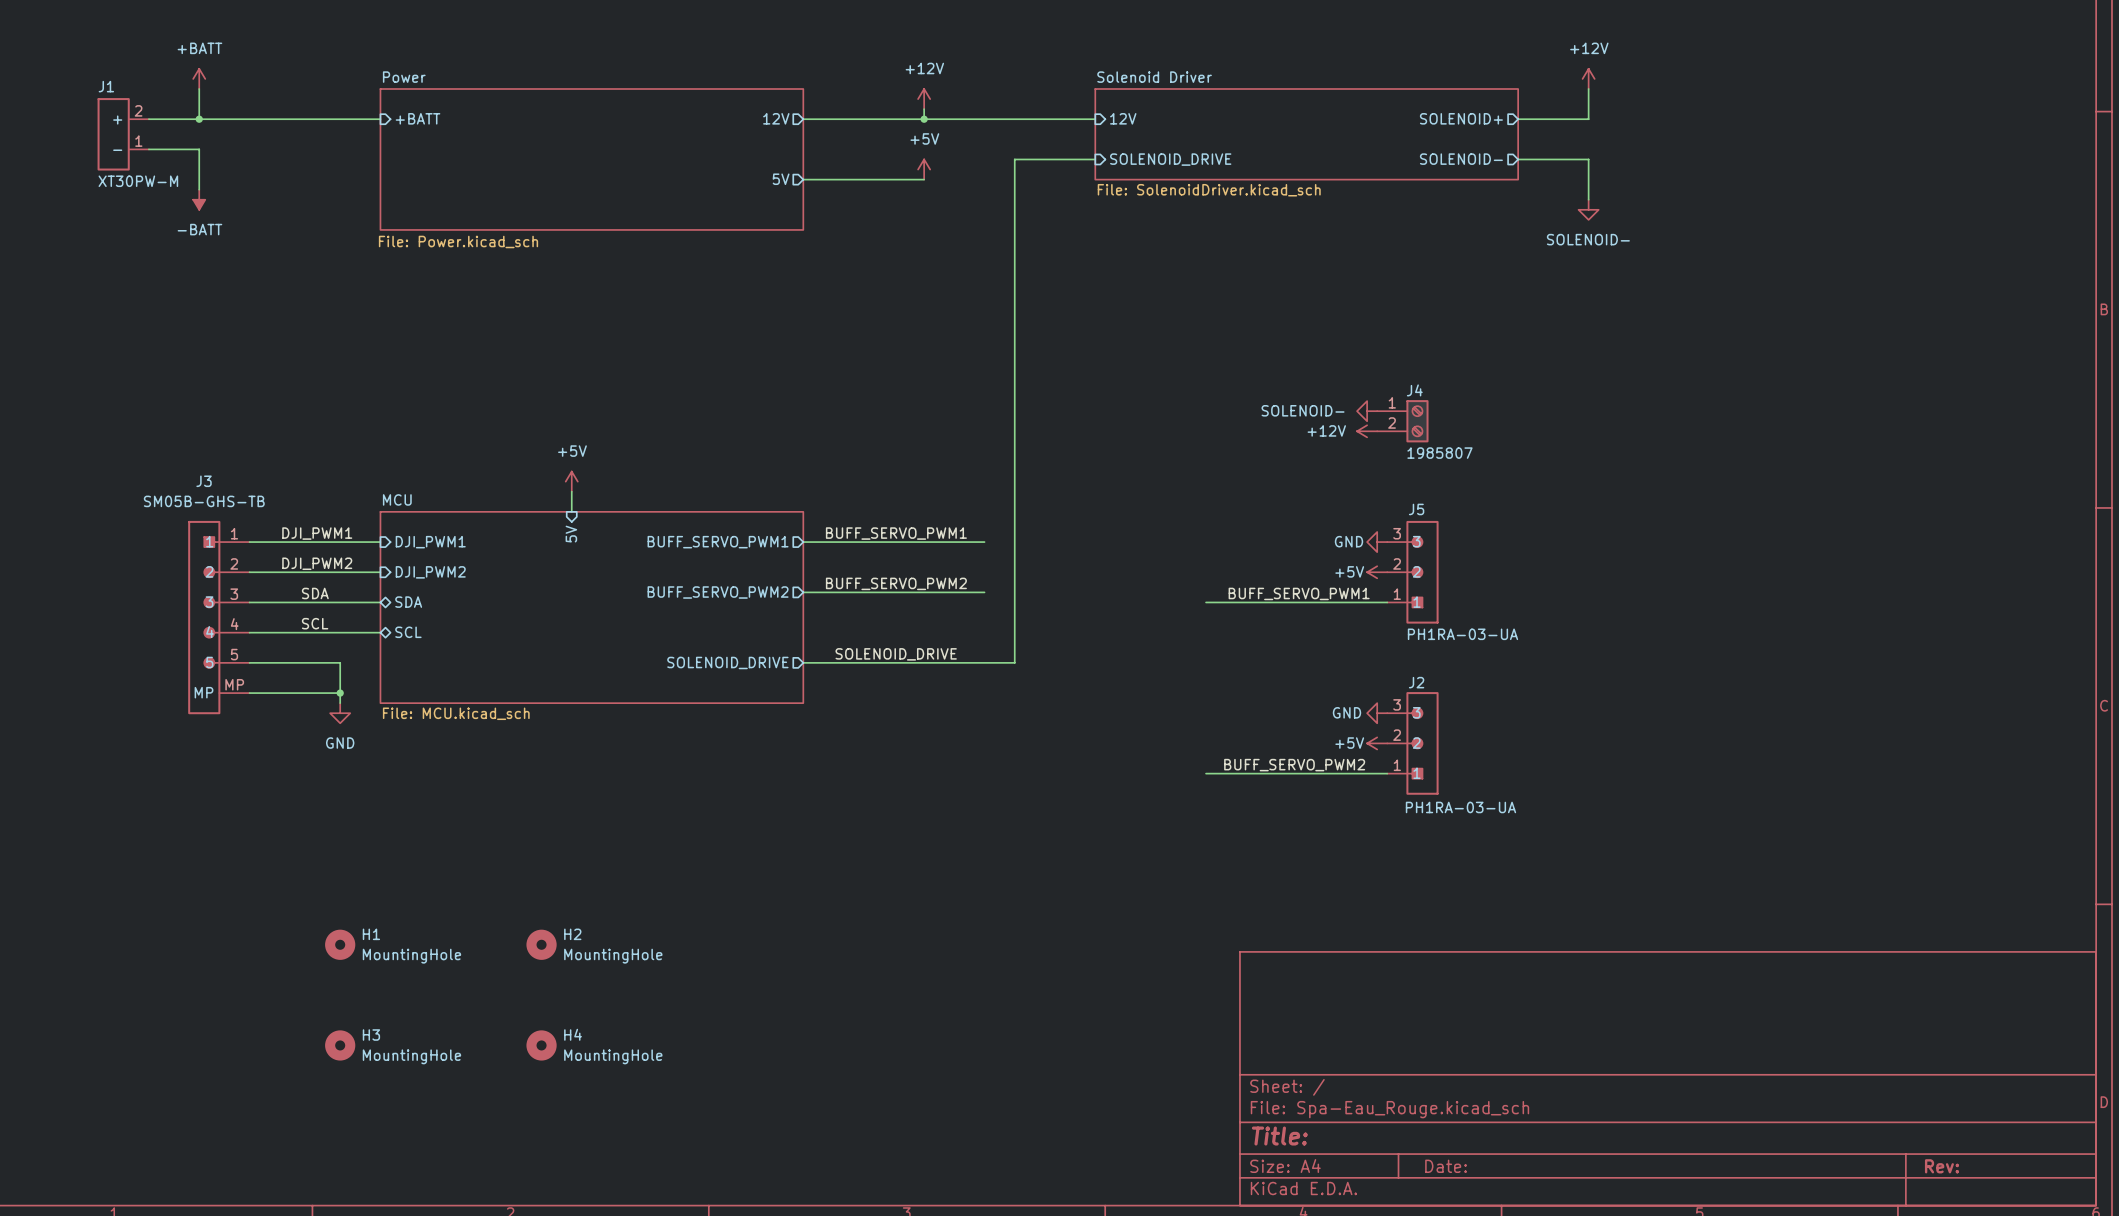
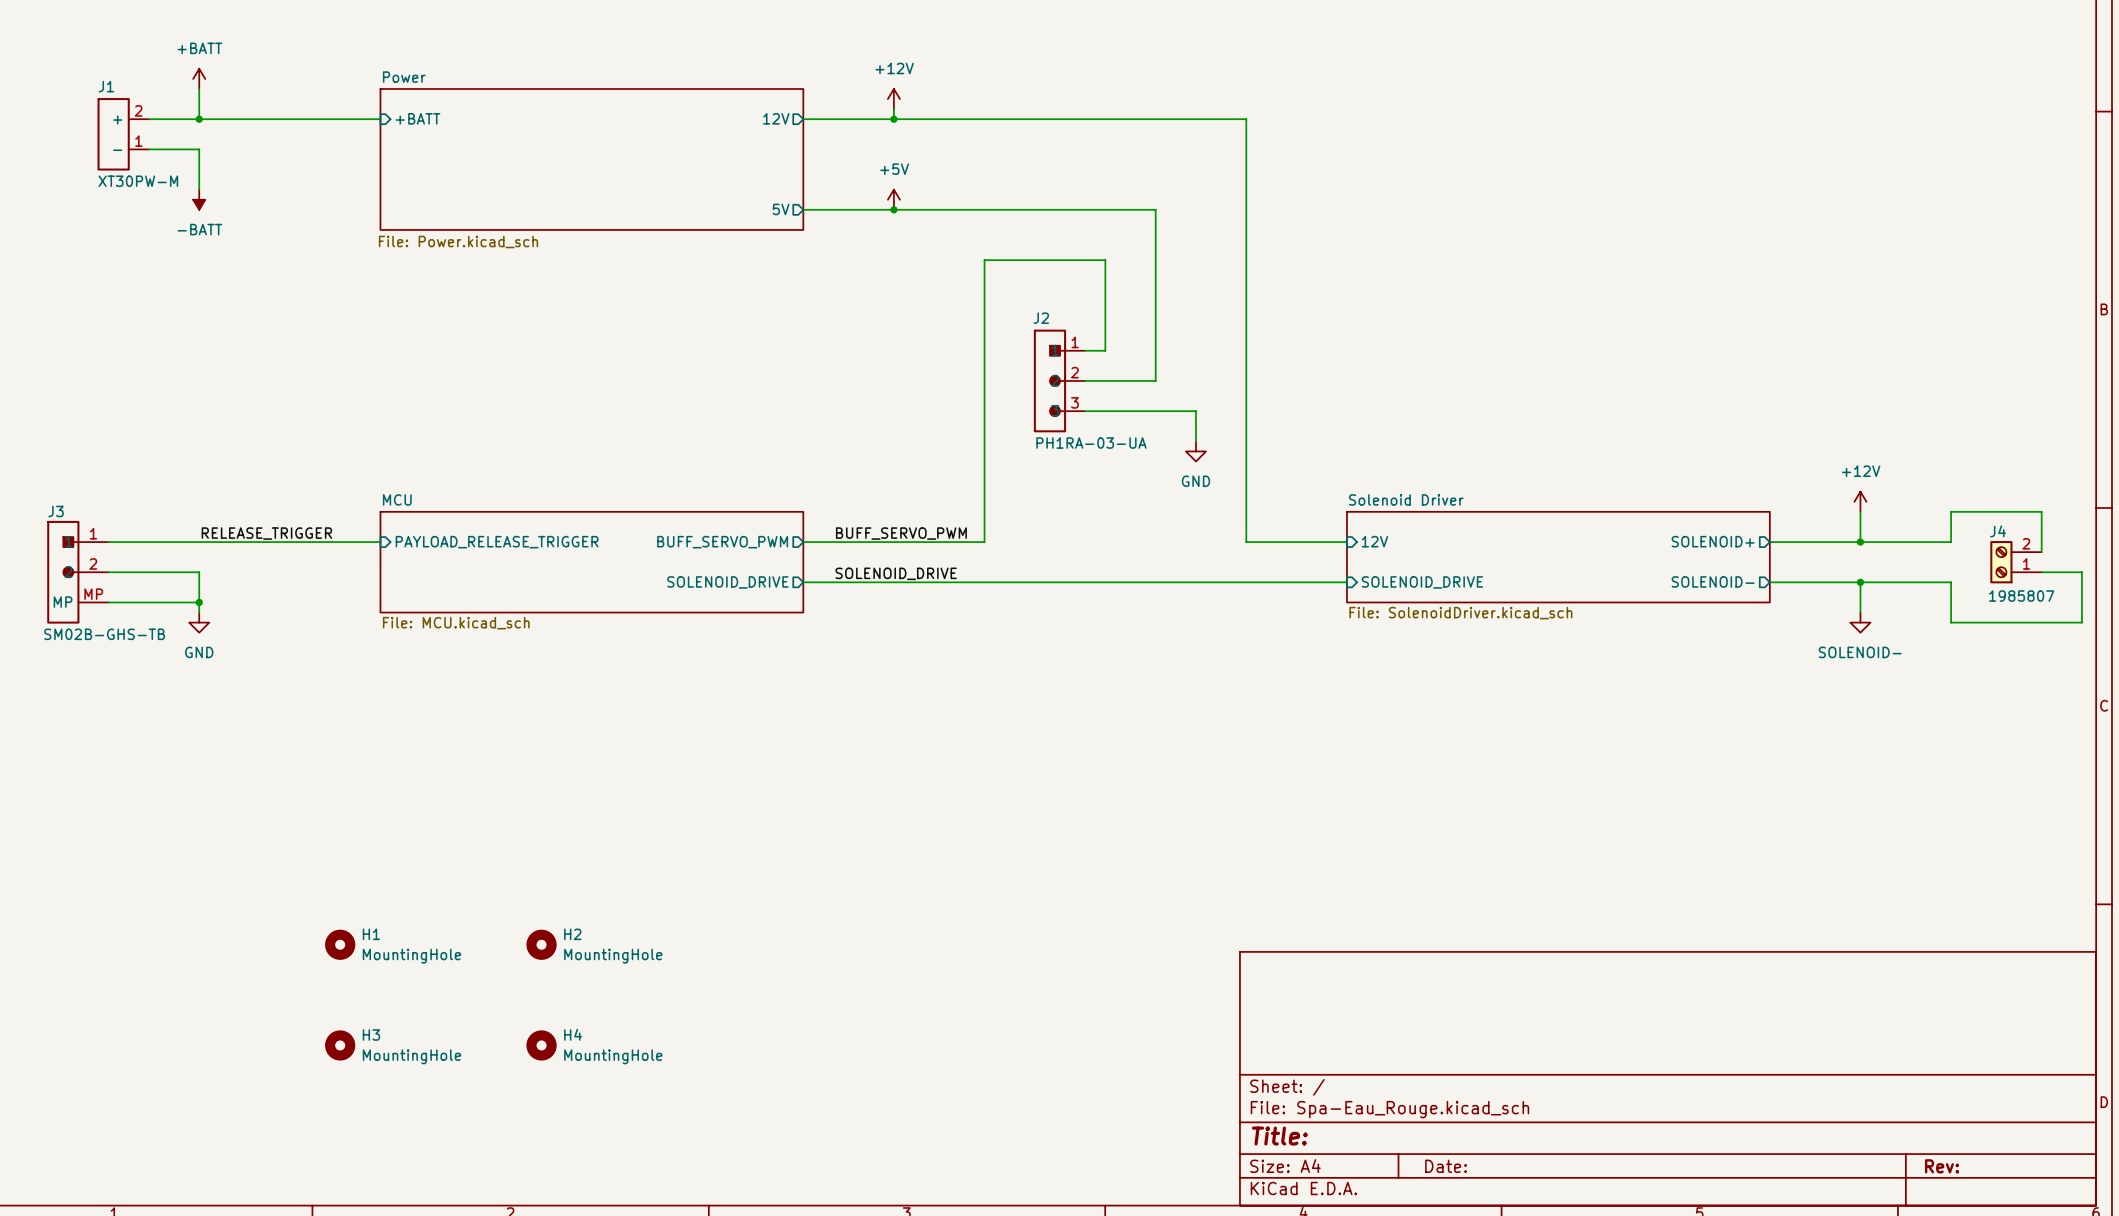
power symbol: +12V (1588, 78) -> none
wire: (1588, 89) (1588, 119) (1518, 119) -> none
power symbol position: +12V (924, 99) -> +12V (893, 99)
wire: (924, 109) (924, 119) -> (893, 109) (893, 119)
sheet pin: 12V (1123, 118) -> none
sheet pin: SOLENOID+ (1461, 118) -> none
junction position: (924, 119) -> (893, 119)
wire: none -> (1095, 119) (1246, 119) (1246, 542) (1346, 542)
sheet Solenoid Driver: File: SolenoidDriver.kicad_sch (1306, 134) -> none
wire: (1095, 159) (1014, 159) (1014, 662) (803, 662) -> none
sheet pin: SOLENOID_DRIVE (1170, 159) -> none
sheet pin: SOLENOID- (1461, 159) -> none
wire: (1518, 159) (1588, 159) (1588, 199) -> none
power symbol position: +5V (924, 169) -> +5V (893, 199)
sheet pin position: 5V (781, 179) -> 5V (781, 209)
wire: (803, 179) (924, 179) -> none
wire: none -> (803, 209) (1155, 209) (1155, 380) (1085, 380)
junction: none -> (893, 209)
power symbol: SOLENOID- (1588, 209) -> none
wire: none -> (1085, 350) (1105, 350) (1105, 260) (984, 260) (984, 542)
J4 name position: J4 (1414, 390) -> J4 (1998, 531)
wire: none -> (1085, 411) (1195, 411) (1195, 441)
power symbol: SOLENOID- (1367, 411) -> none
J4 position: (1402, 421) -> (2016, 562)
J4 rotation: 0° (1417, 421) -> 180° (2001, 562)
power symbol: +12V (1367, 431) -> none
power symbol: none -> GND (1195, 451)
J4 value position: 1985807 (1439, 453) -> 1985807 (2021, 596)
J3 name position: J3 (204, 481) -> J3 (56, 511)
power symbol: +5V (571, 481) -> none
wire: (571, 491) (571, 511) -> none
J3 value: SM05B-GHS-TB (204, 501) -> SM02B-GHS-TB (104, 634)
power symbol: none -> +12V (1860, 501)
wire: none -> (1860, 511) (1860, 542)
J3 symbol: [188, 520, 250, 715] -> [47, 520, 109, 624]
label: none -> RELEASE_TRIGGER (266, 533)
label: DJI_PWM1 (317, 533) -> none
label: BUFF_SERVO_PWM1 (896, 533) -> BUFF_SERVO_PWM (901, 533)
sheet pin: 5V (571, 534) -> none
sheet pin: none -> 12V (1374, 541)
sheet pin: none -> SOLENOID+ (1713, 541)
wire: none -> (108, 542) (249, 542)
sheet pin: DJI_PWM1 (430, 542) -> PAYLOAD_RELEASE_TRIGGER (497, 542)
sheet pin: BUFF_SERVO_PWM1 (718, 542) -> BUFF_SERVO_PWM (722, 542)
power symbol: GND (1377, 542) -> none
wire: none -> (1769, 542) (1951, 542) (1951, 511) (2041, 511) (2041, 552)
junction: none -> (1860, 542)
sheet Solenoid Driver: none -> File: SolenoidDriver.kicad_sch (1558, 557)
sheet MCU: none -> File: MCU.kicad_sch (591, 562)
label: DJI_PWM2 (317, 563) -> none
wire: (249, 572) (380, 572) -> none
sheet pin: DJI_PWM2 (430, 572) -> none
power symbol: +5V (1377, 572) -> none
J5: PH1RA-03-UA (1412, 572) -> none
wire: none -> (2041, 572) (2081, 572) (2081, 622) (1951, 622) (1951, 582) (1769, 582)
sheet pin: none -> SOLENOID- (1713, 581)
wire: none -> (803, 582) (1346, 582)
sheet pin: none -> SOLENOID_DRIVE (1422, 582)
wire: none -> (1860, 582) (1860, 612)
junction: none -> (1860, 582)
label: BUFF_SERVO_PWM2 (896, 583) -> none
sheet pin: BUFF_SERVO_PWM2 (718, 592) -> none
wire: (803, 592) (984, 592) -> none
label: SDA (315, 593) -> none
label: BUFF_SERVO_PWM1 (1299, 593) -> none
junction: none -> (199, 602)
wire: (249, 602) (380, 602) -> none
sheet pin: SDA (408, 602) -> none
wire: (1206, 602) (1387, 602) -> none
sheet MCU: File: MCU.kicad_sch (591, 607) -> none
power symbol: none -> SOLENOID- (1860, 622)
label: SCL (315, 623) -> none
wire: (249, 632) (380, 632) -> none
sheet pin: SCL (408, 632) -> none
label position: SOLENOID_DRIVE (896, 654) -> SOLENOID_DRIVE (896, 573)
wire: (249, 662) (340, 662) (340, 703) -> (108, 572) (199, 572) (199, 612)
sheet pin position: SOLENOID_DRIVE (727, 662) -> SOLENOID_DRIVE (727, 582)
J2 name position: J2 (1416, 682) -> J2 (1041, 318)
wire: (249, 693) (340, 693) -> (108, 602) (199, 602)
junction: (340, 693) -> none
power symbol position: GND (340, 713) -> GND (199, 622)
power symbol: GND (1377, 713) -> none
power symbol: +5V (1377, 743) -> none
J2 position: (1412, 743) -> (1059, 380)
J2 rotation: 0° (1422, 743) -> 180° (1049, 380)
label: BUFF_SERVO_PWM2 (1294, 765) -> none
wire: (1206, 773) (1387, 773) -> none
J2 value position: PH1RA-03-UA (1460, 807) -> PH1RA-03-UA (1091, 443)

